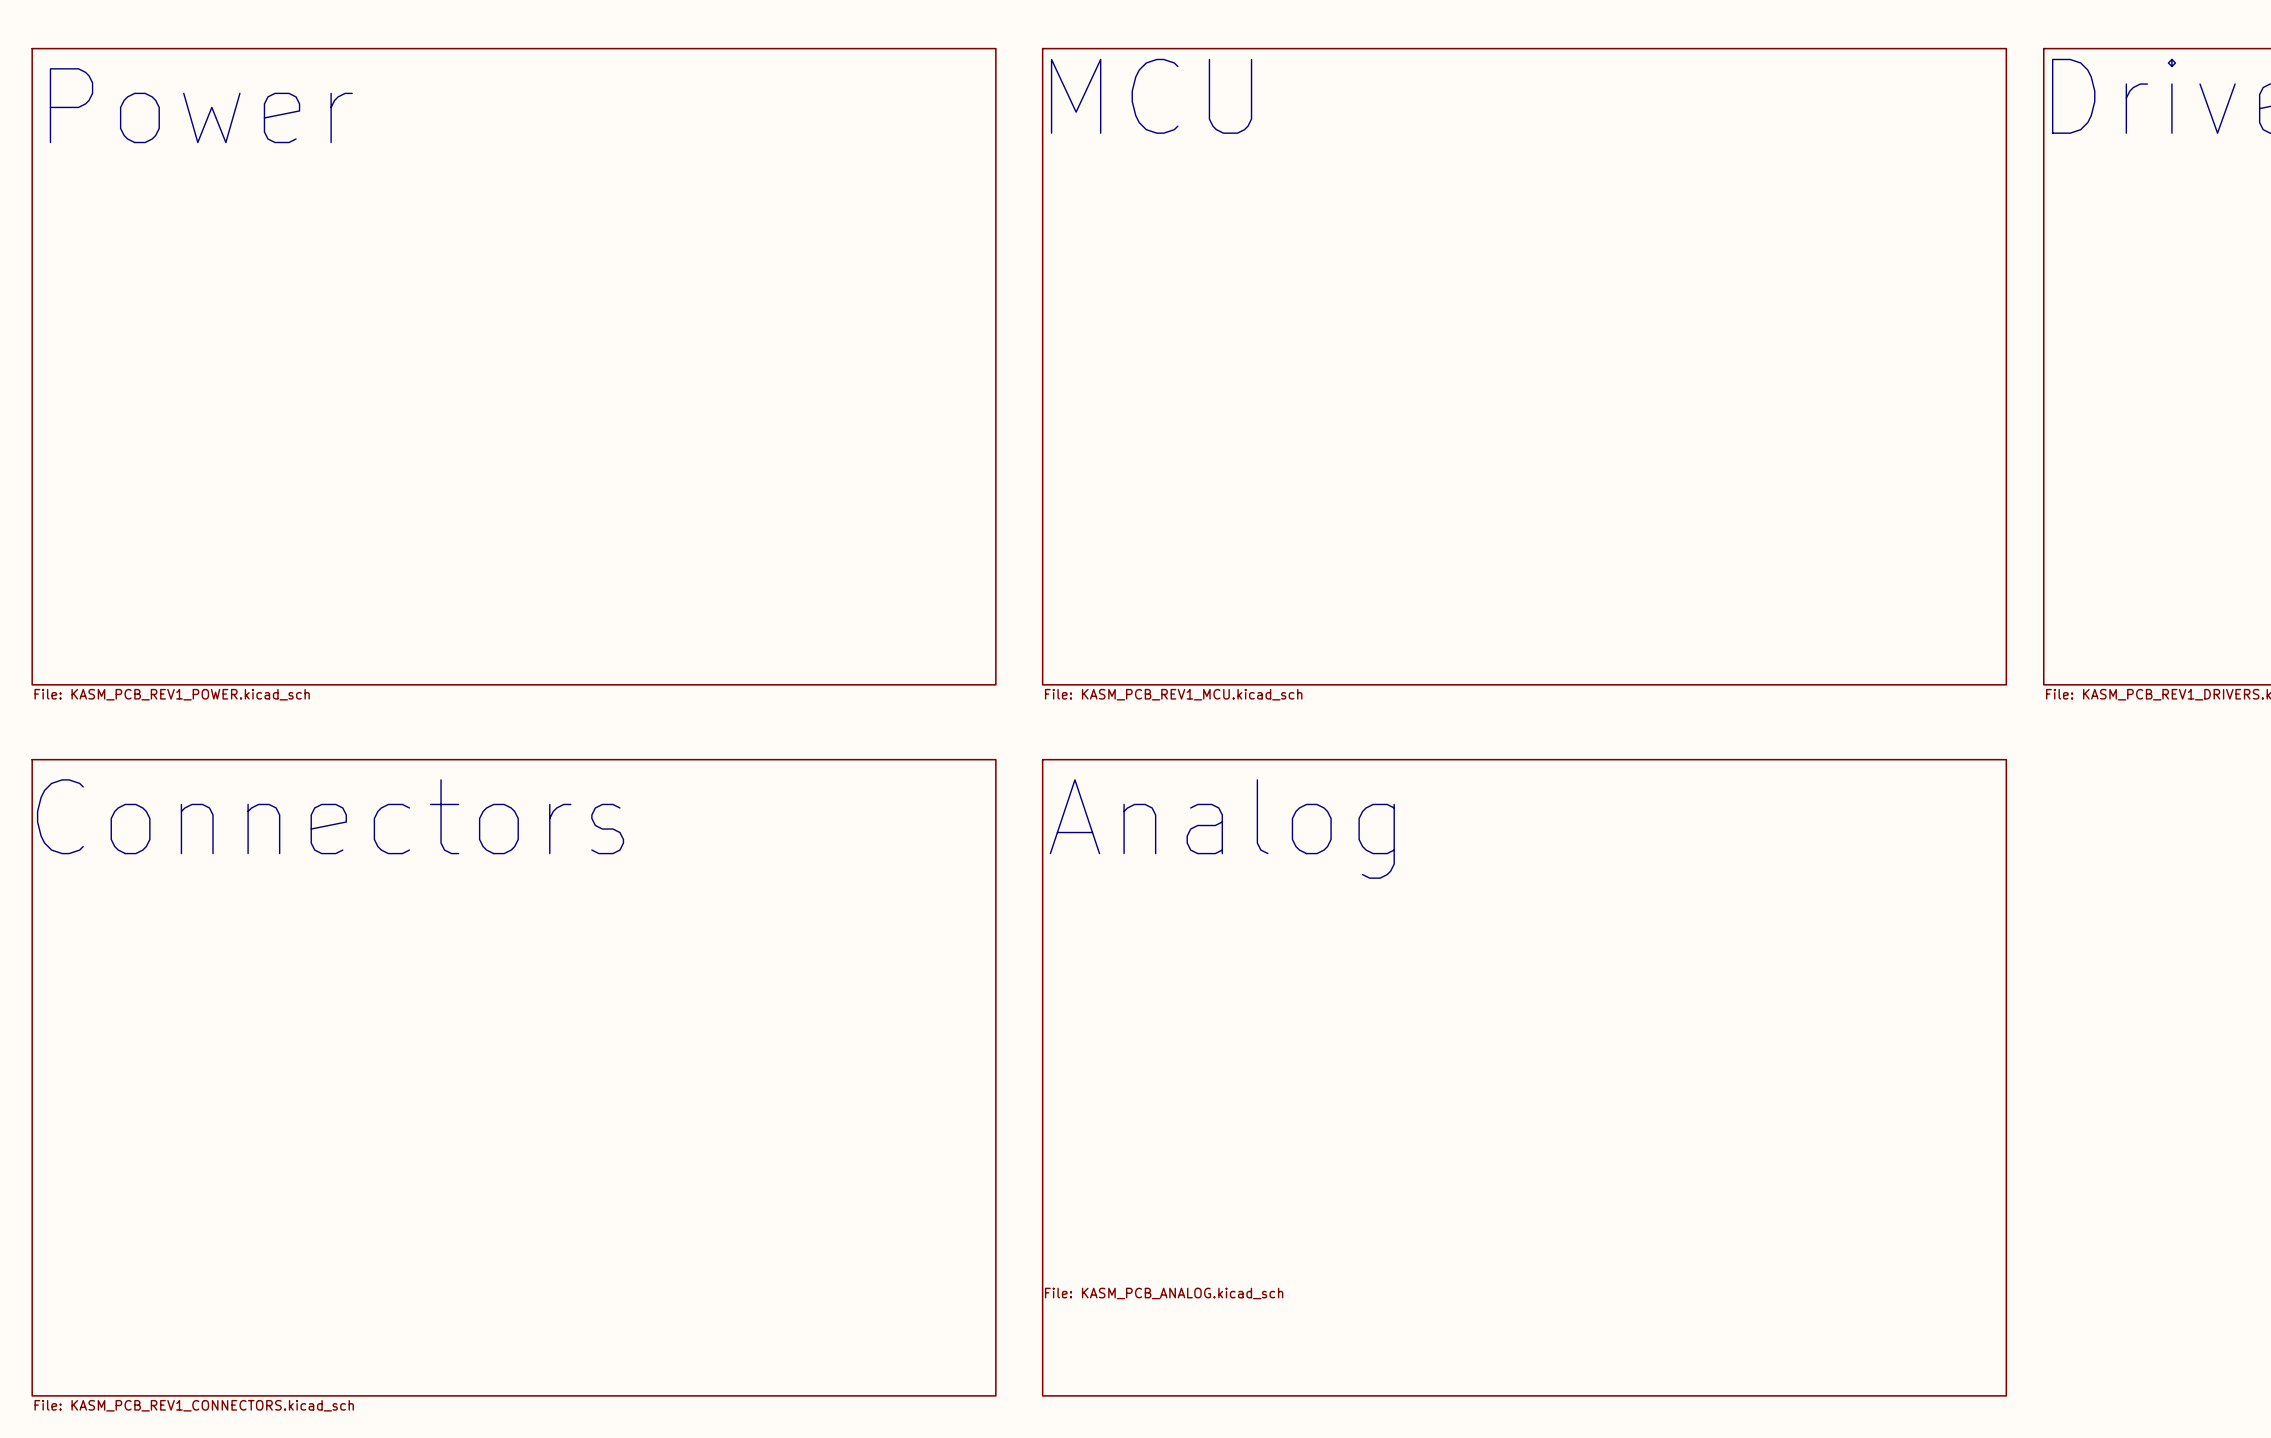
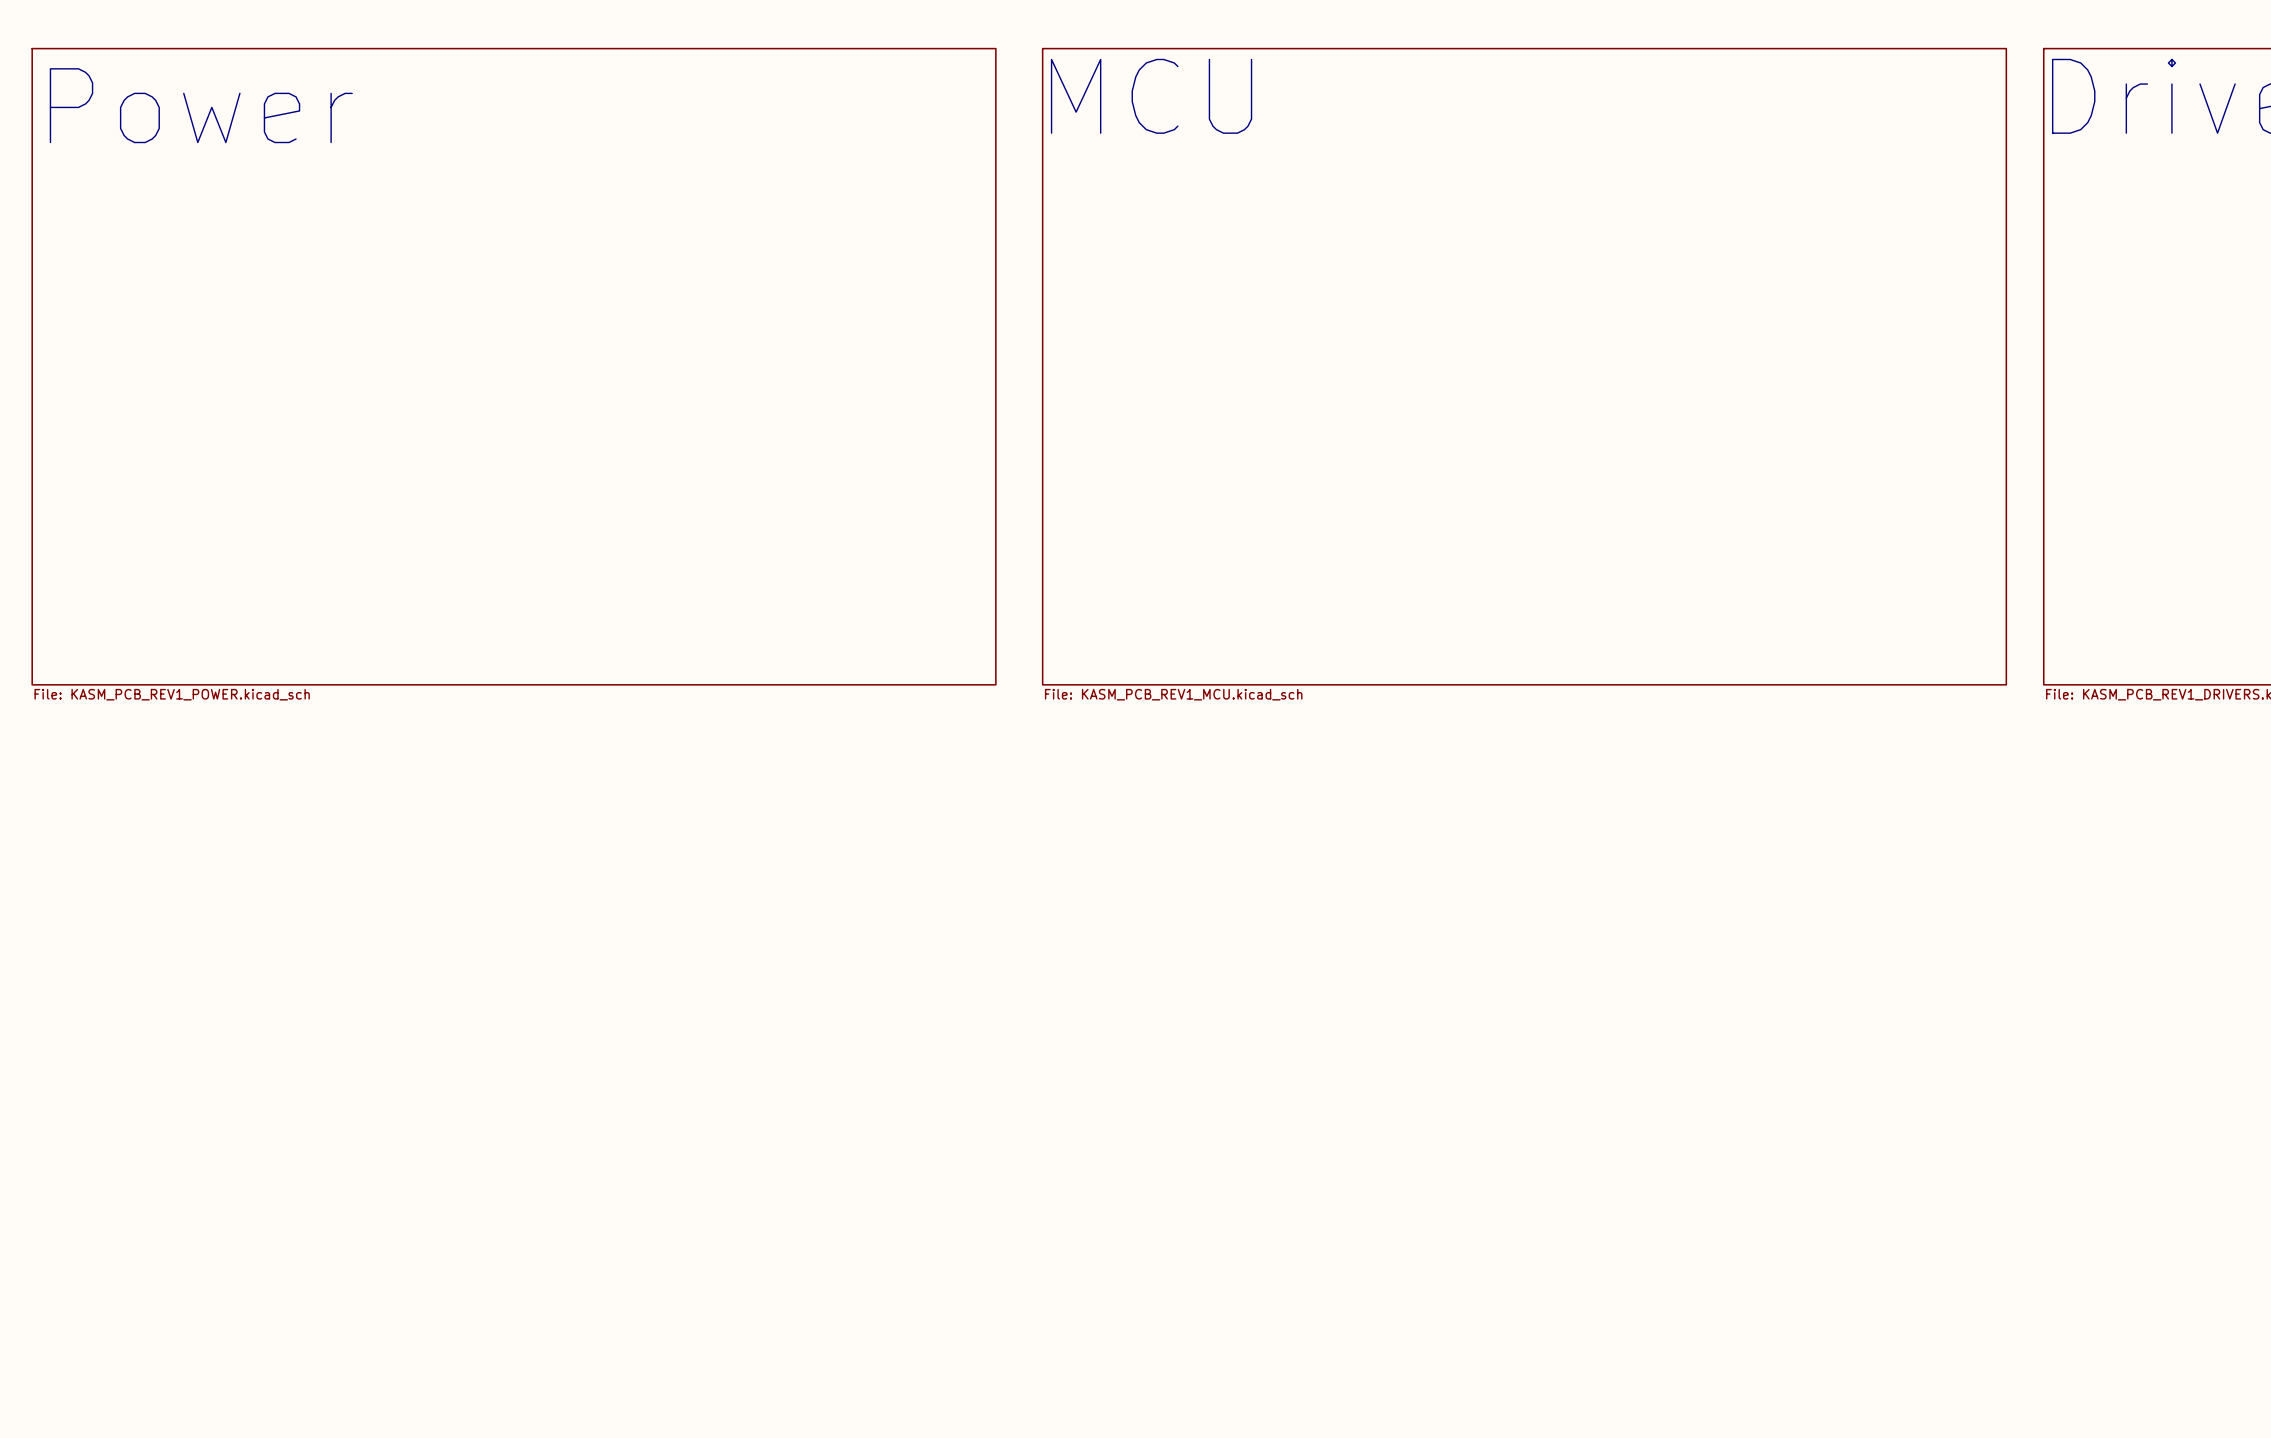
sheet Connectors: File: KASM_PCB_REV1_CONNECTORS.kicad_sch (514, 1077) -> none
sheet Analog: File: KASM_PCB_ANALOG.kicad_sch (1524, 1077) -> none

